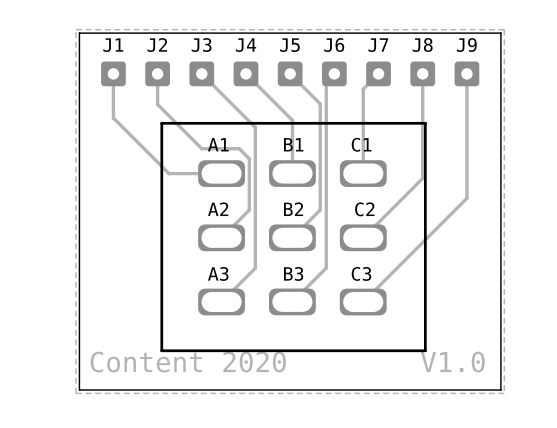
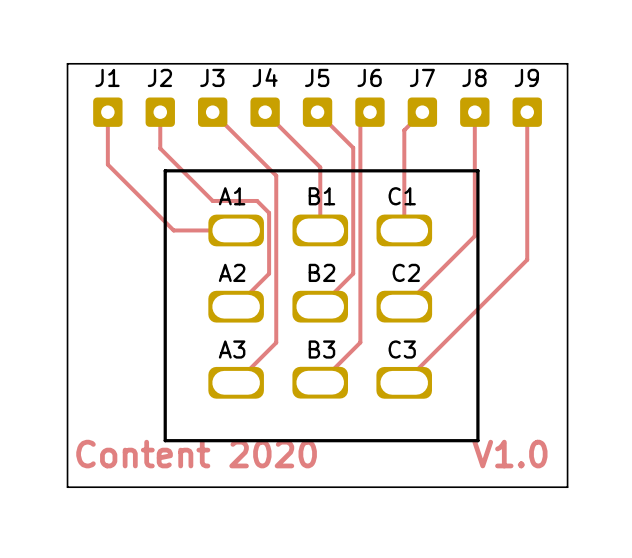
zone outline: (76, 29) (76, 393) (504, 393) (504, 29) (76, 29) -> none

